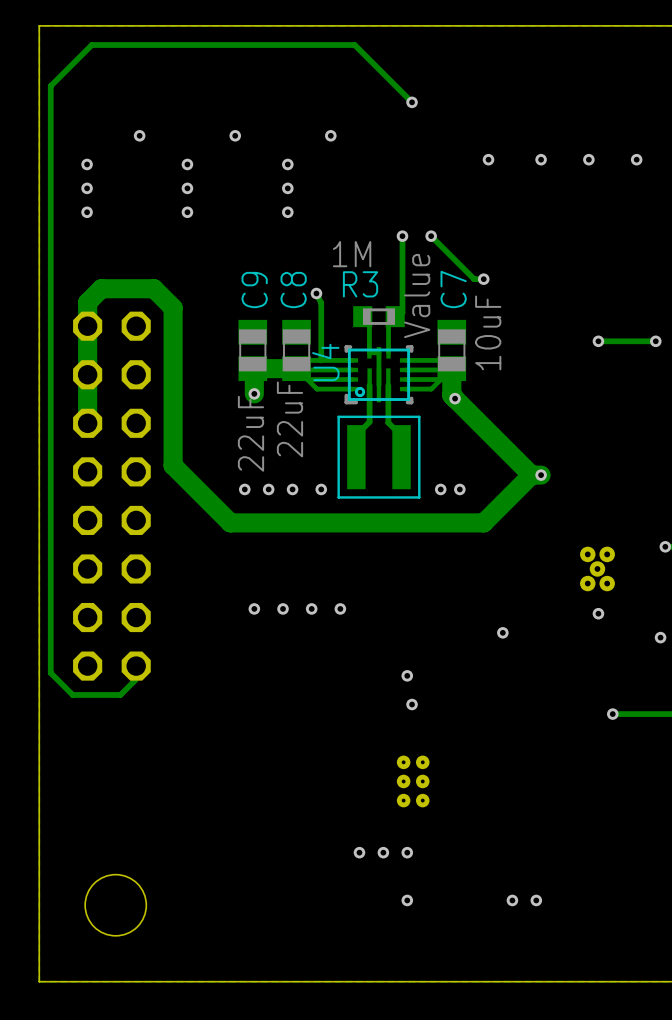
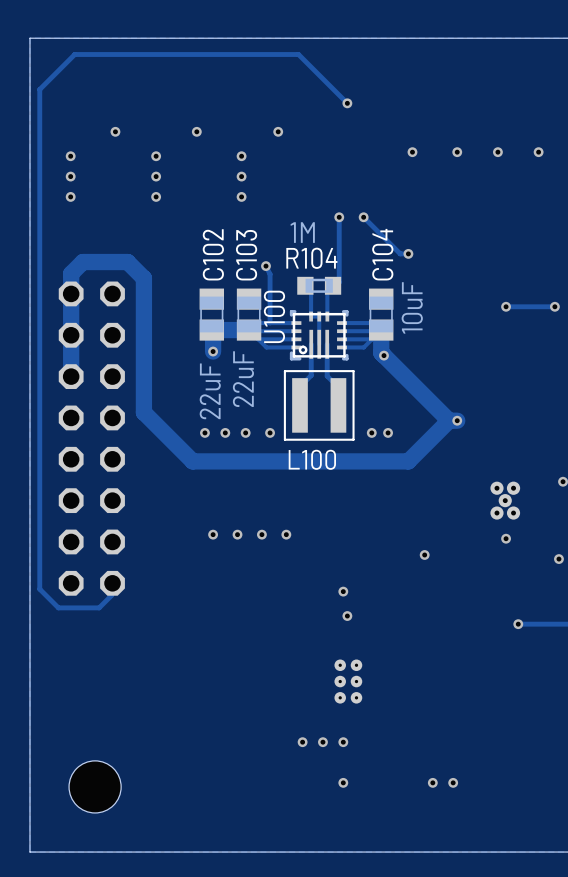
R3 name: R3 (360, 284) -> R104 (311, 258)
C7 name: C7 (453, 289) -> C104 (382, 254)
C9 name: C9 (254, 290) -> C102 (213, 254)
C8 name: C8 (293, 290) -> C103 (246, 255)
U4 value: Value (417, 295) -> none
U4 name: U4 (325, 362) -> U100 (274, 316)
text: none -> L100 (312, 459)

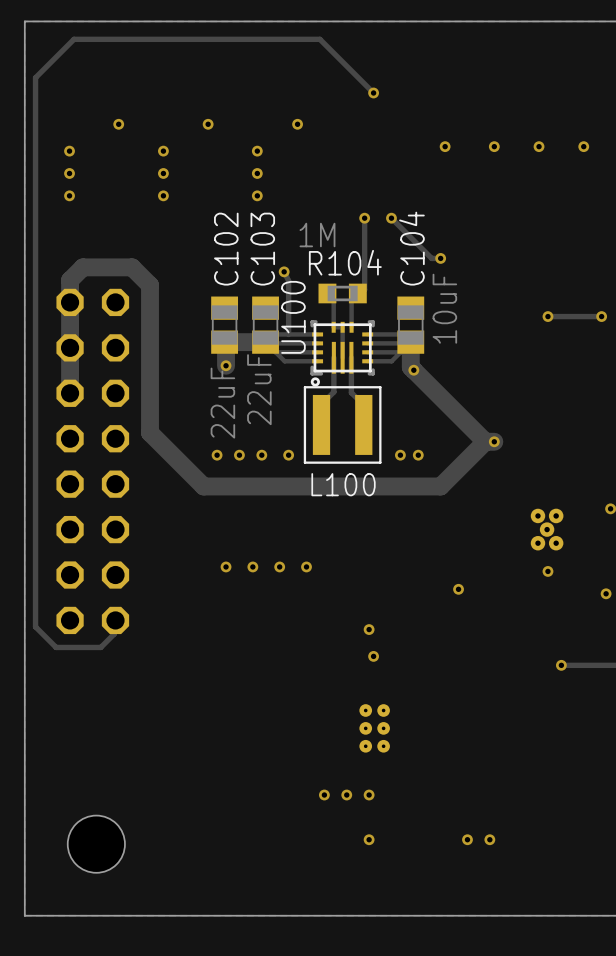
U100 footprint: [289, 310, 349, 361] -> [310, 320, 375, 387]

